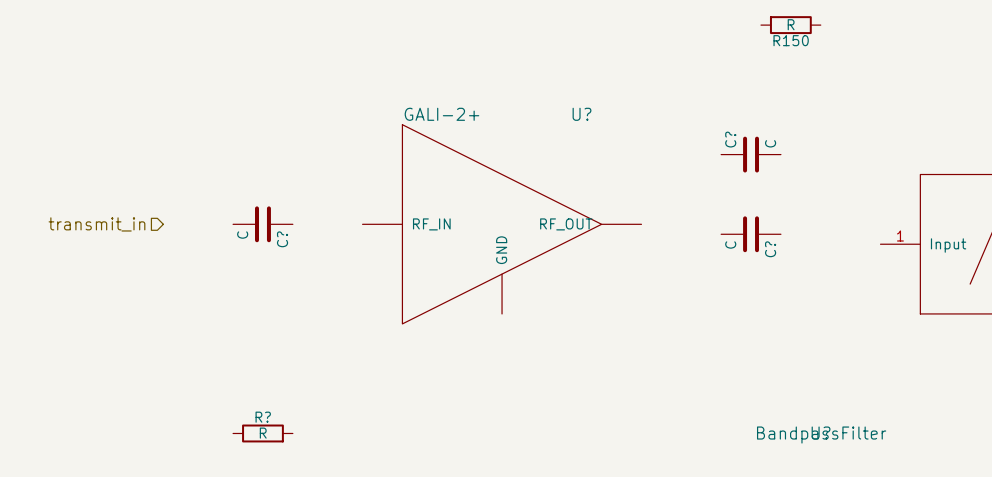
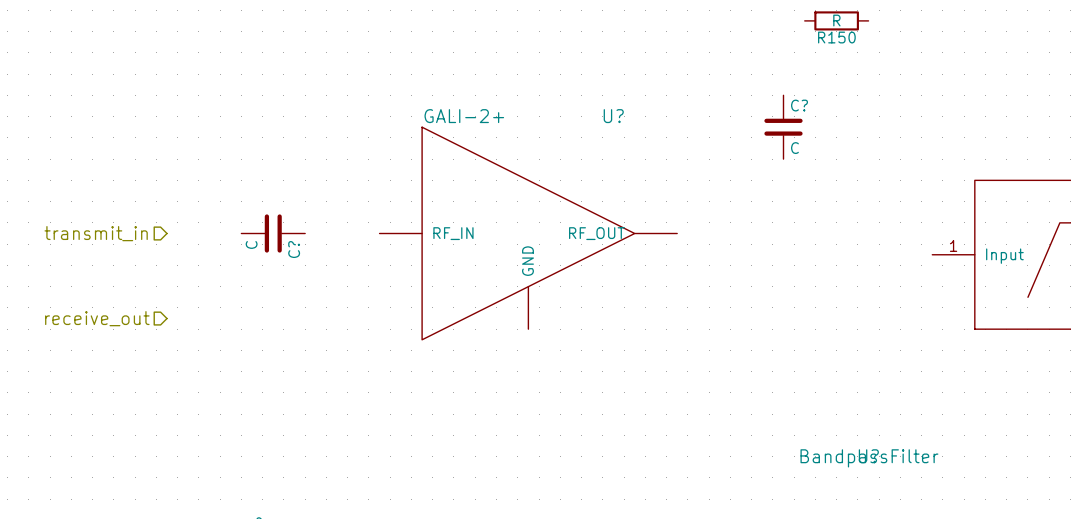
C? rotation: 0° (751, 154) -> 90° clockwise (783, 127)
C?: C (751, 234) -> none
hierarchical label: none -> receive_out (97, 318)
R?: R (262, 433) -> none

